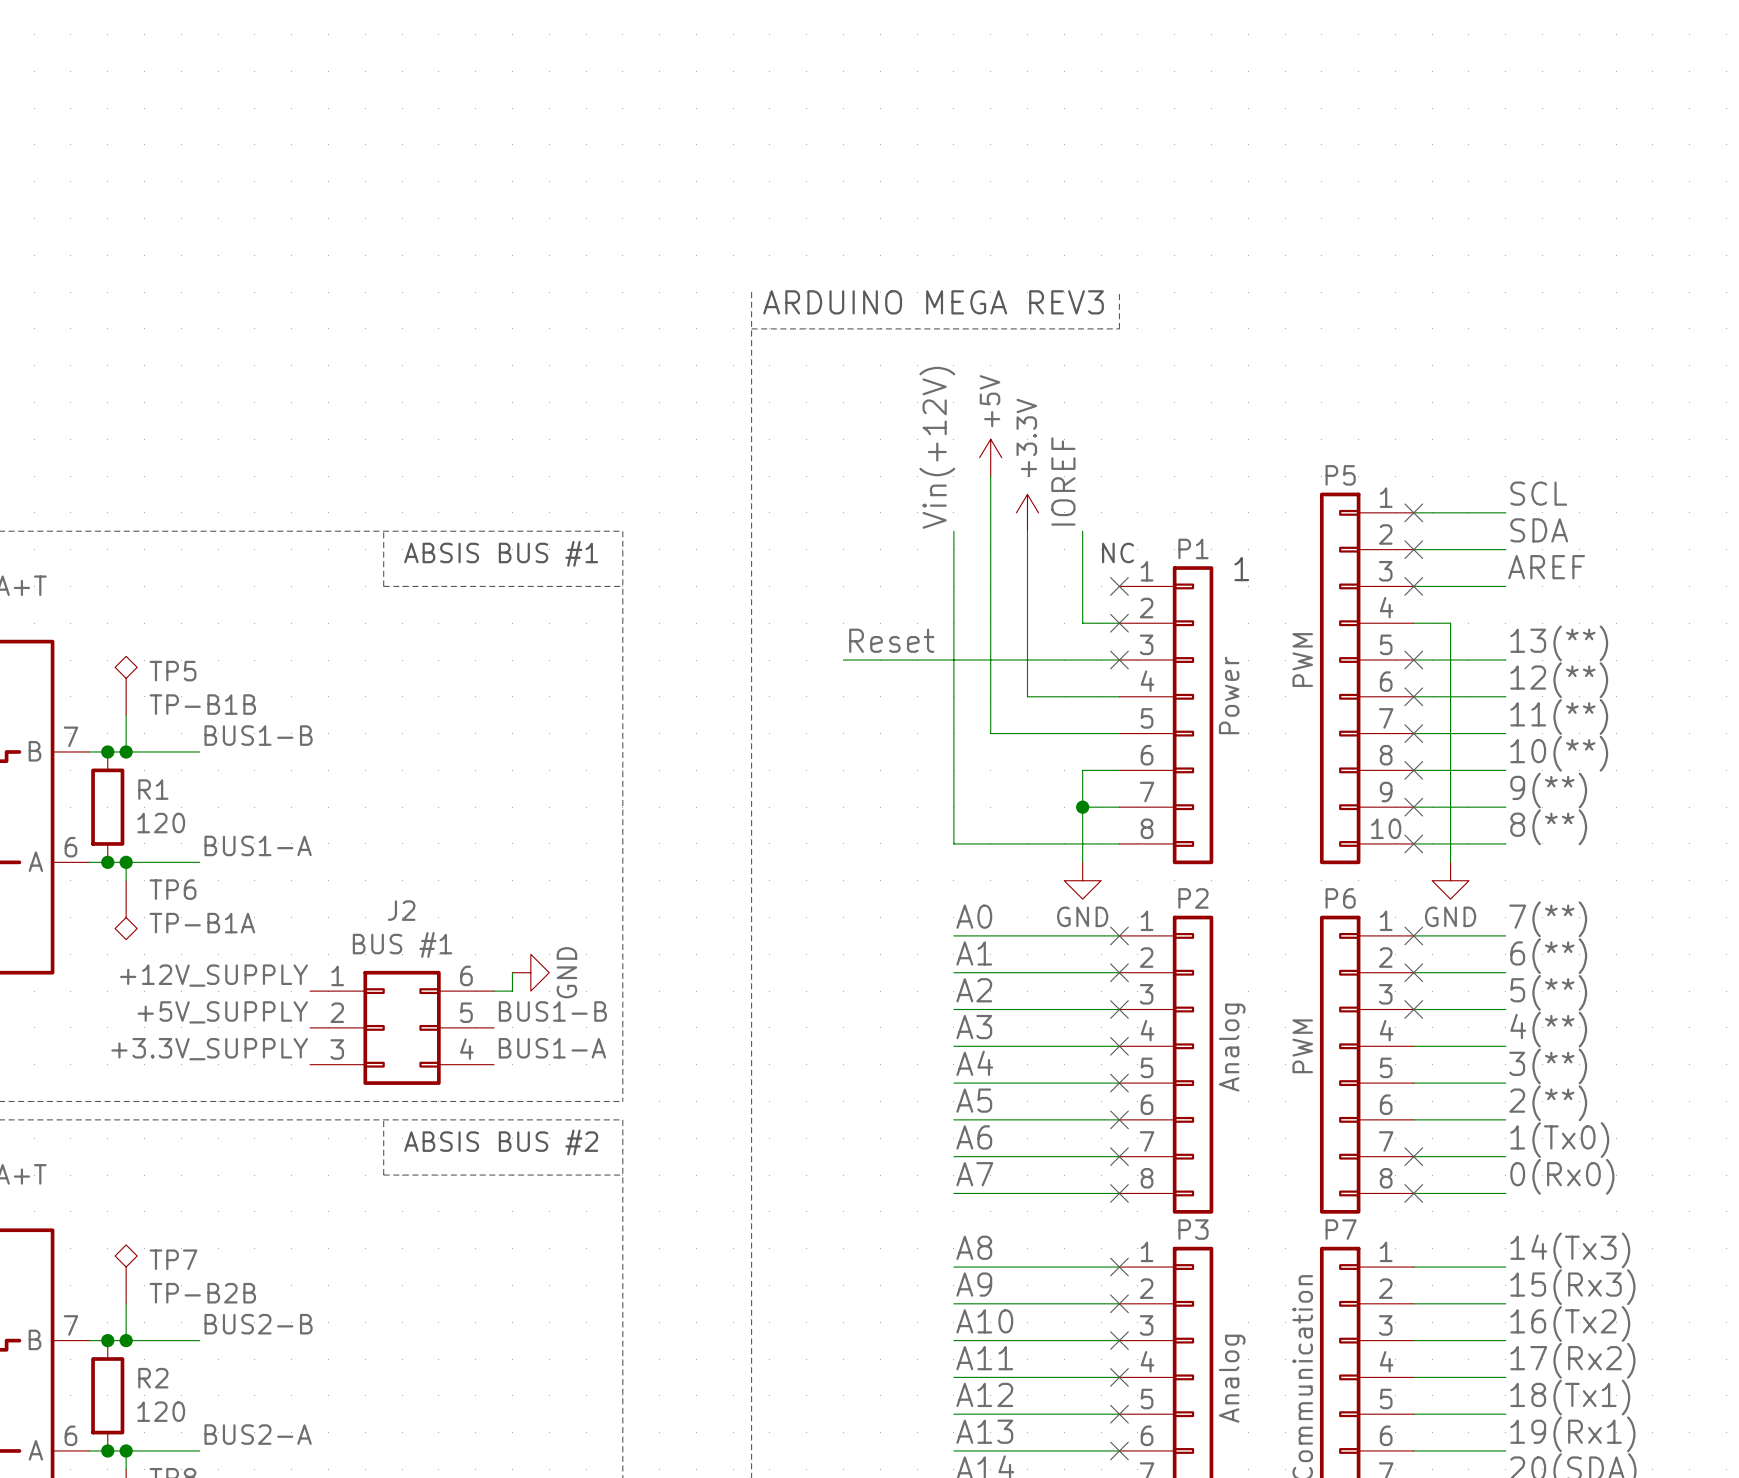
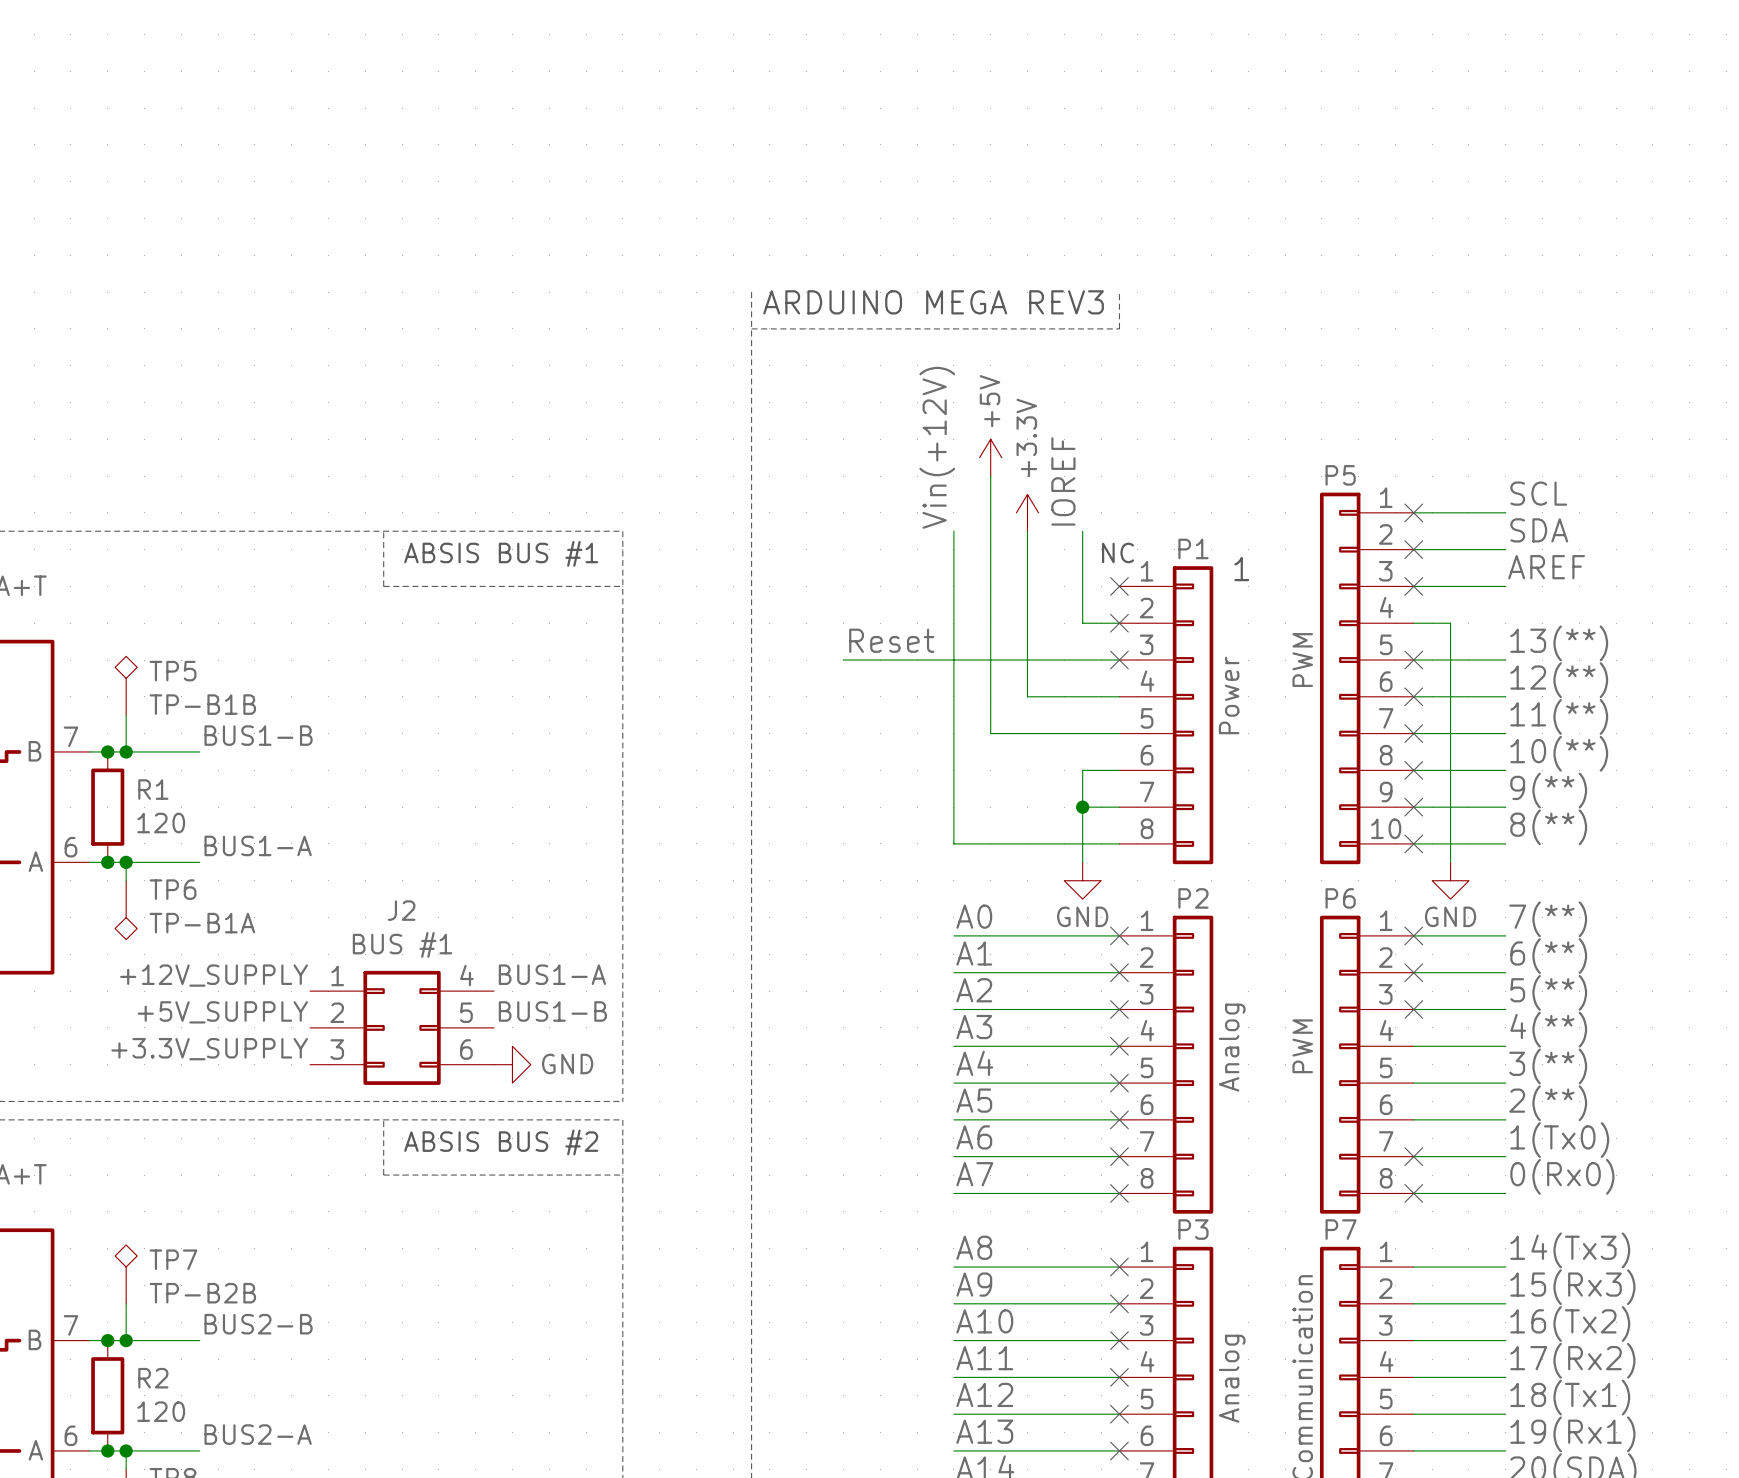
wire: (512, 972) (512, 991) (494, 991) -> none
power symbol position: GND (530, 972) -> GND (512, 1064)
power symbol text rotation: 0° (566, 972) -> 90° clockwise (567, 1064)
J2 pin number: 6 (466, 975) -> 4 (466, 975)
label position: BUS1-A (552, 1048) -> BUS1-A (552, 974)
J2 pin number: 4 (466, 1049) -> 6 (466, 1049)

